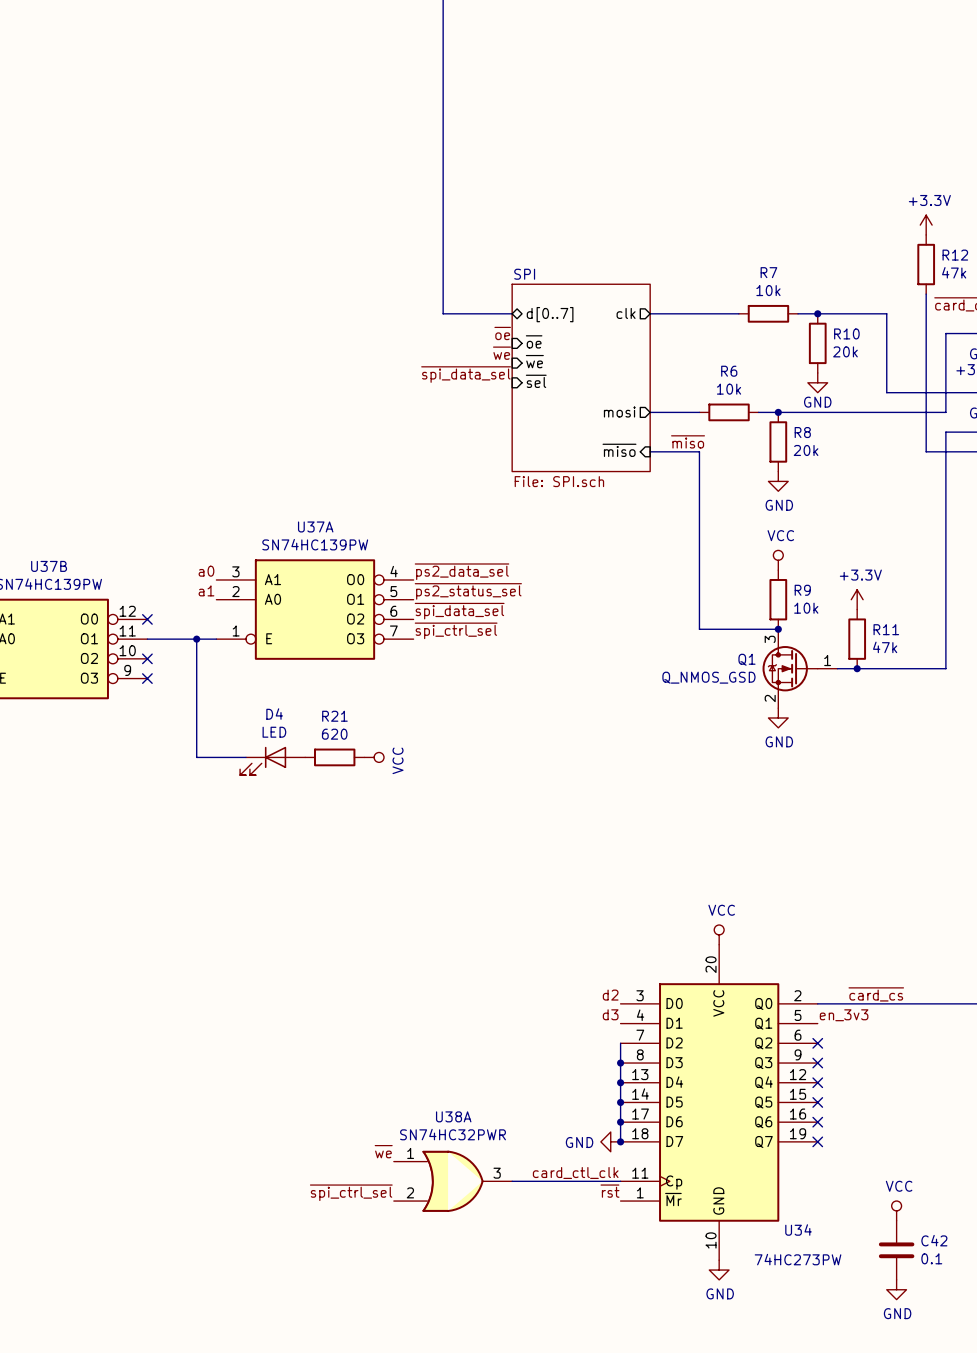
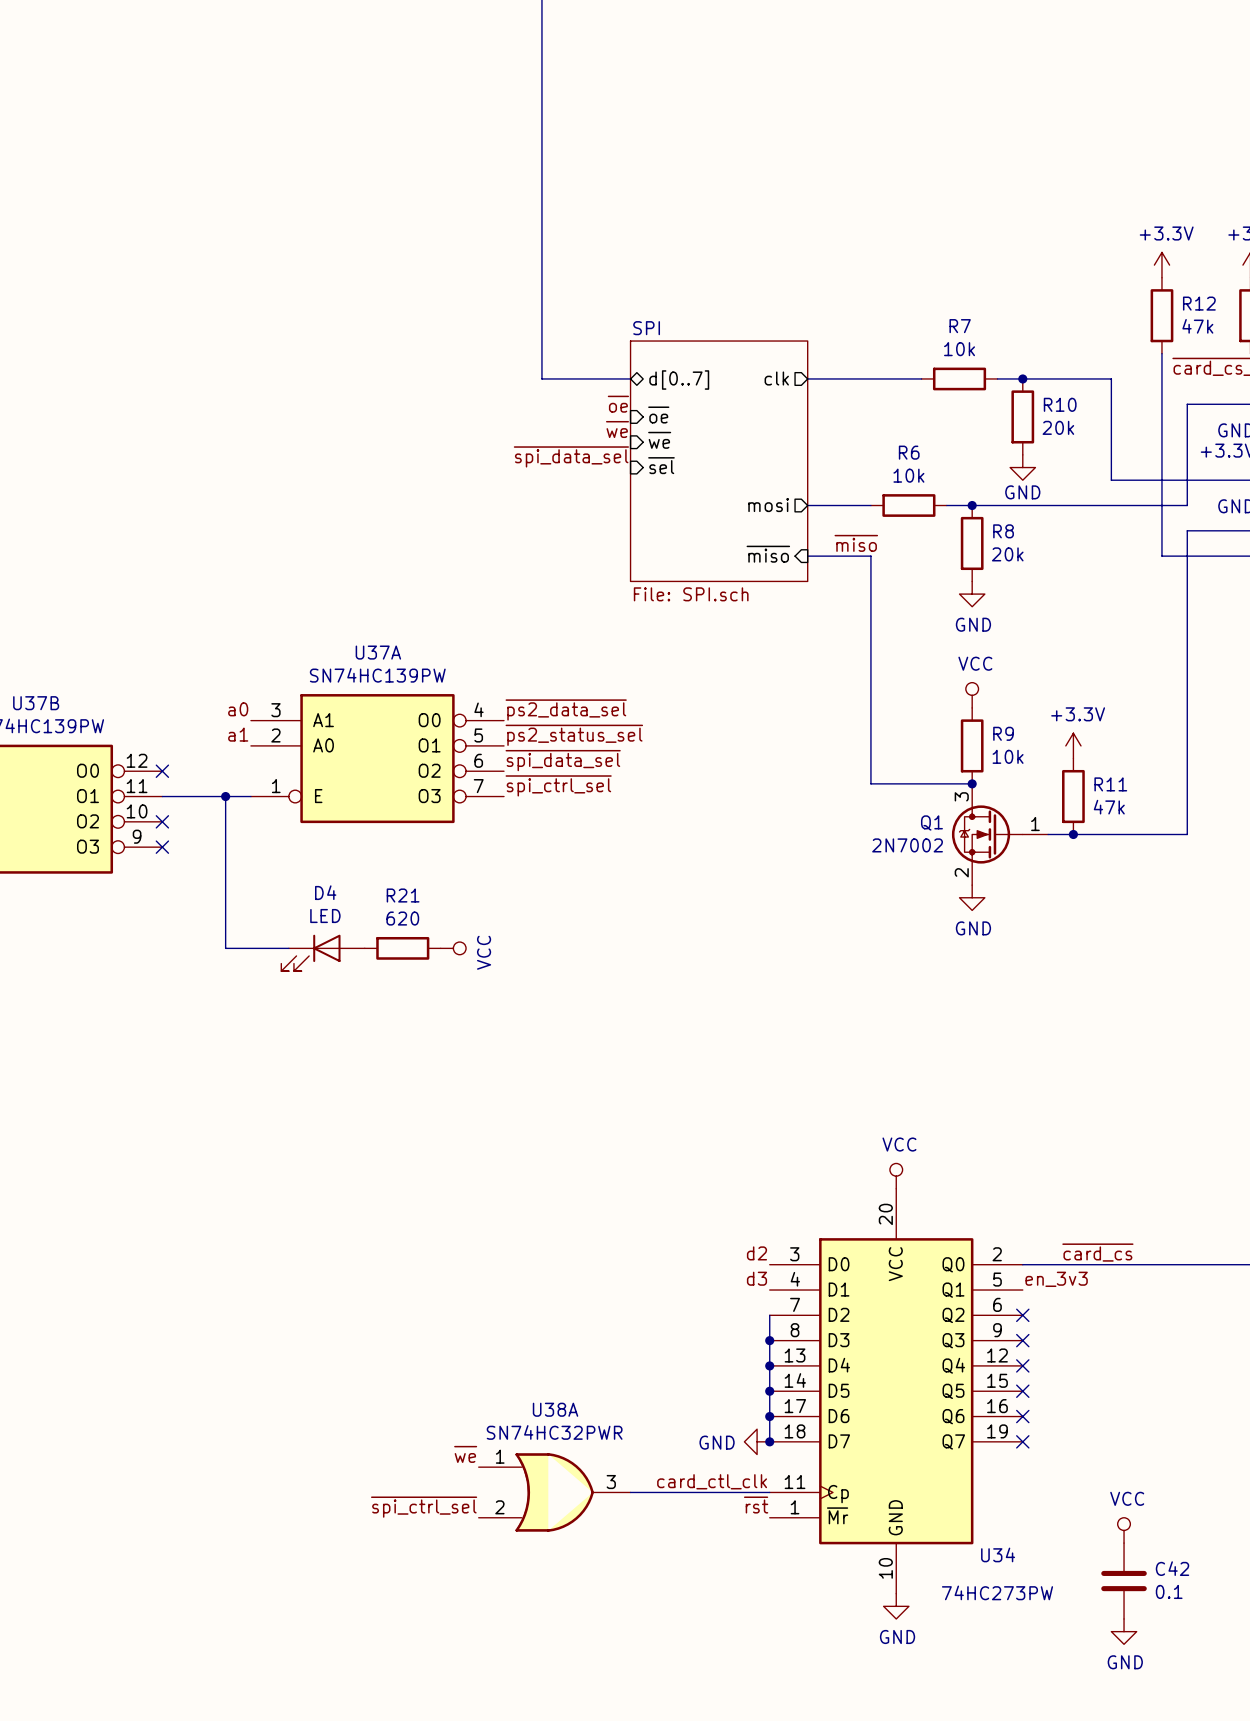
Q1 value: Q_NMOS_GSD (708, 677) -> 2N7002 (907, 845)

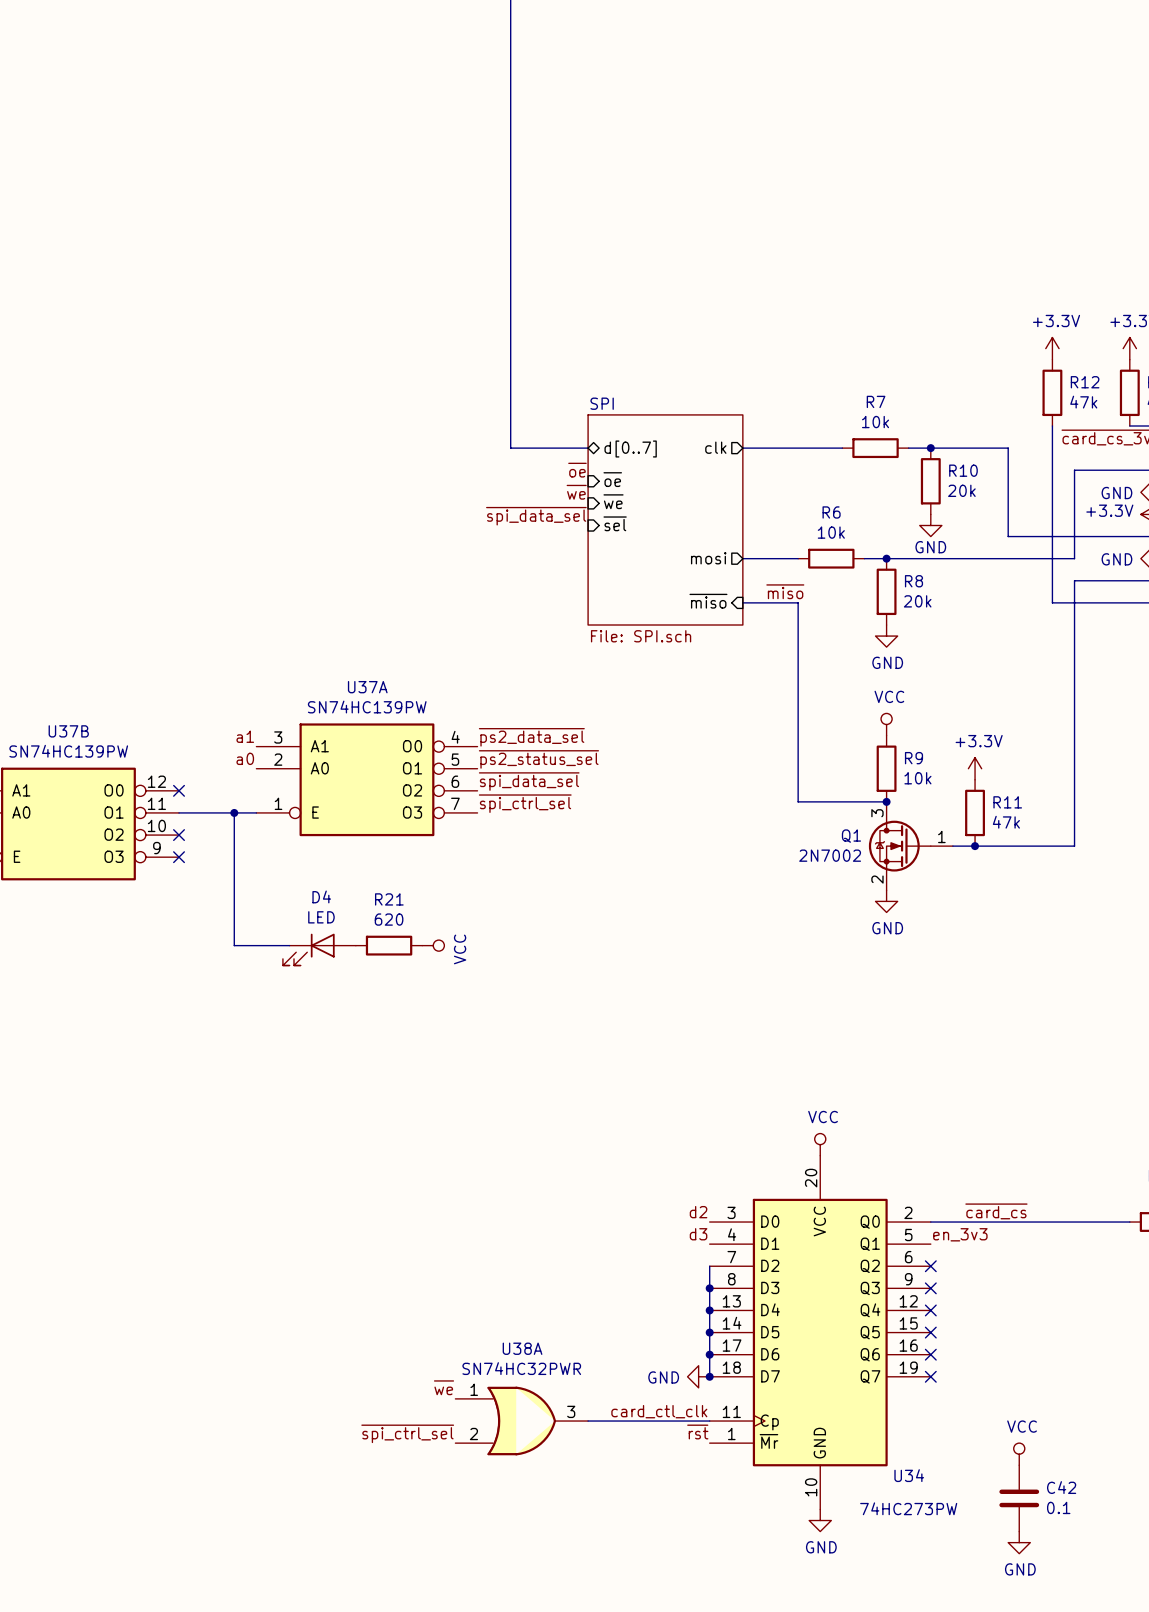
label: a0 (238, 709) -> a1 (245, 736)
label: a1 (238, 734) -> a0 (245, 758)

